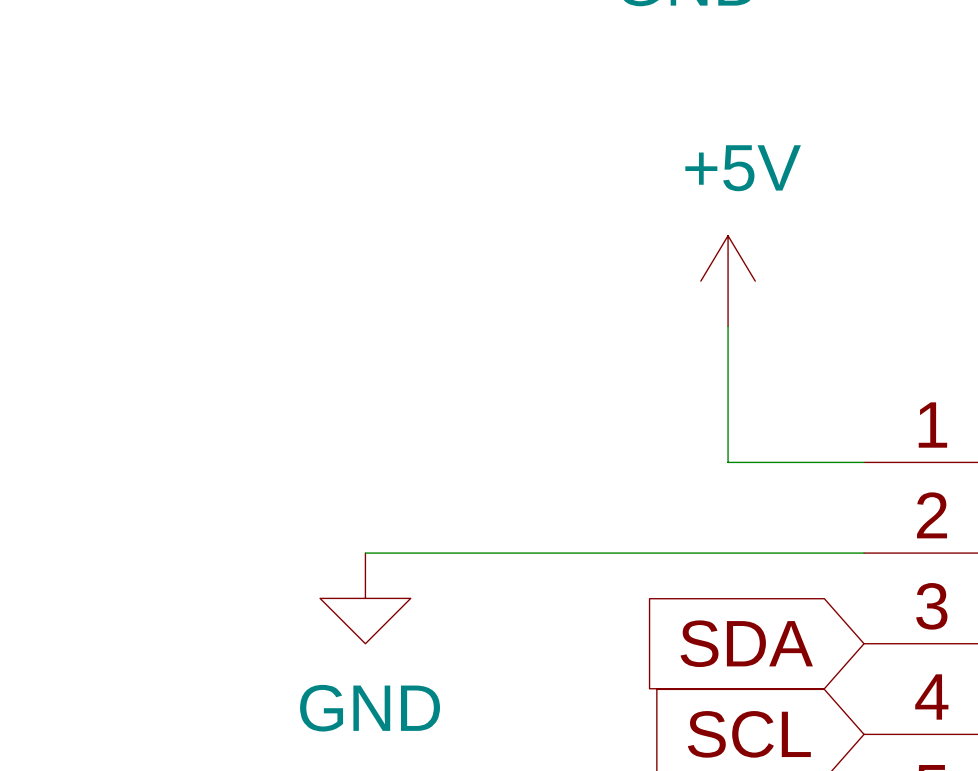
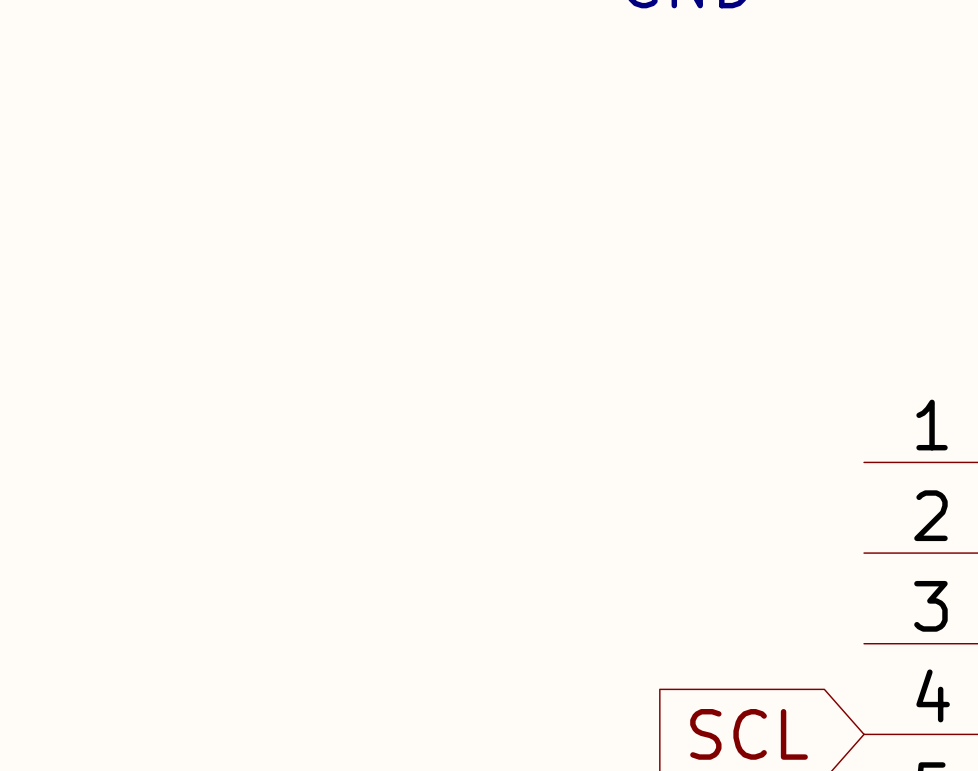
power symbol: +5V (728, 281) -> none
wire: (728, 326) (728, 462) (864, 462) -> none
wire: (365, 553) (864, 553) -> none
power symbol: GND (365, 598) -> none
global label: SDA (746, 643) -> none

